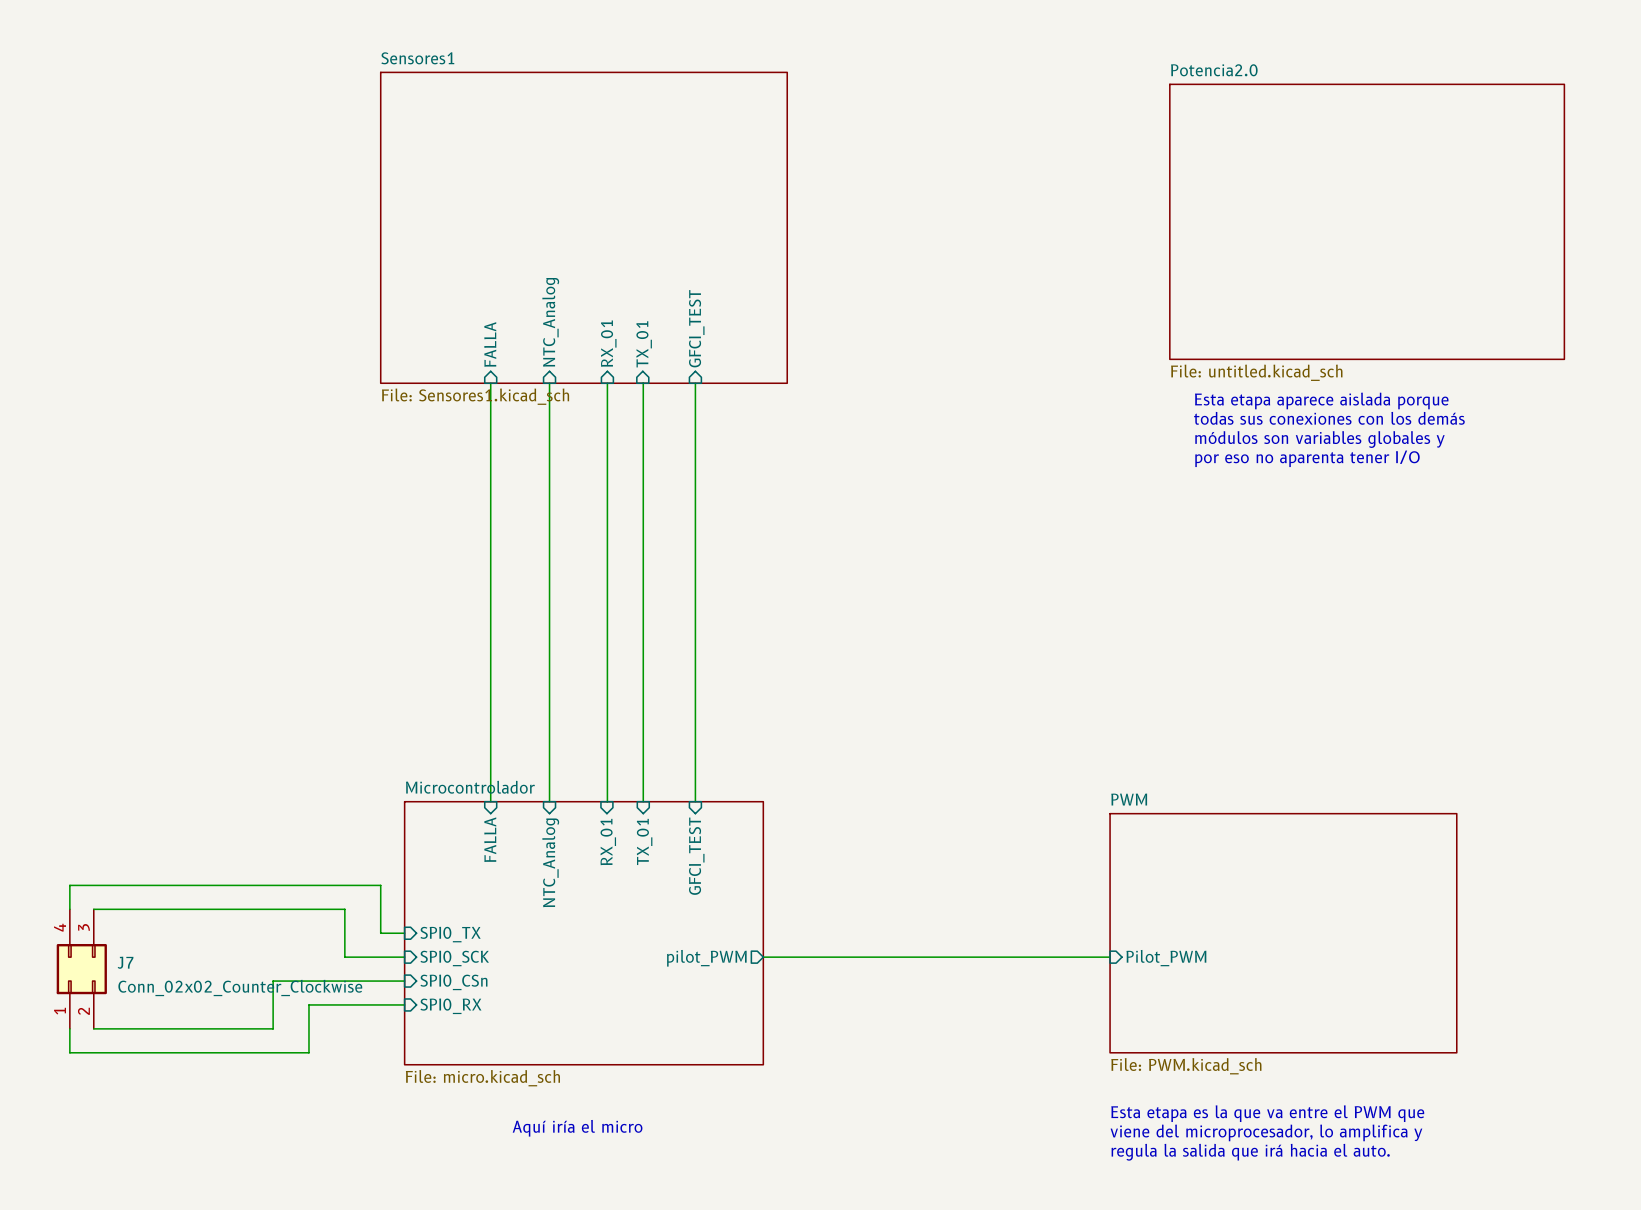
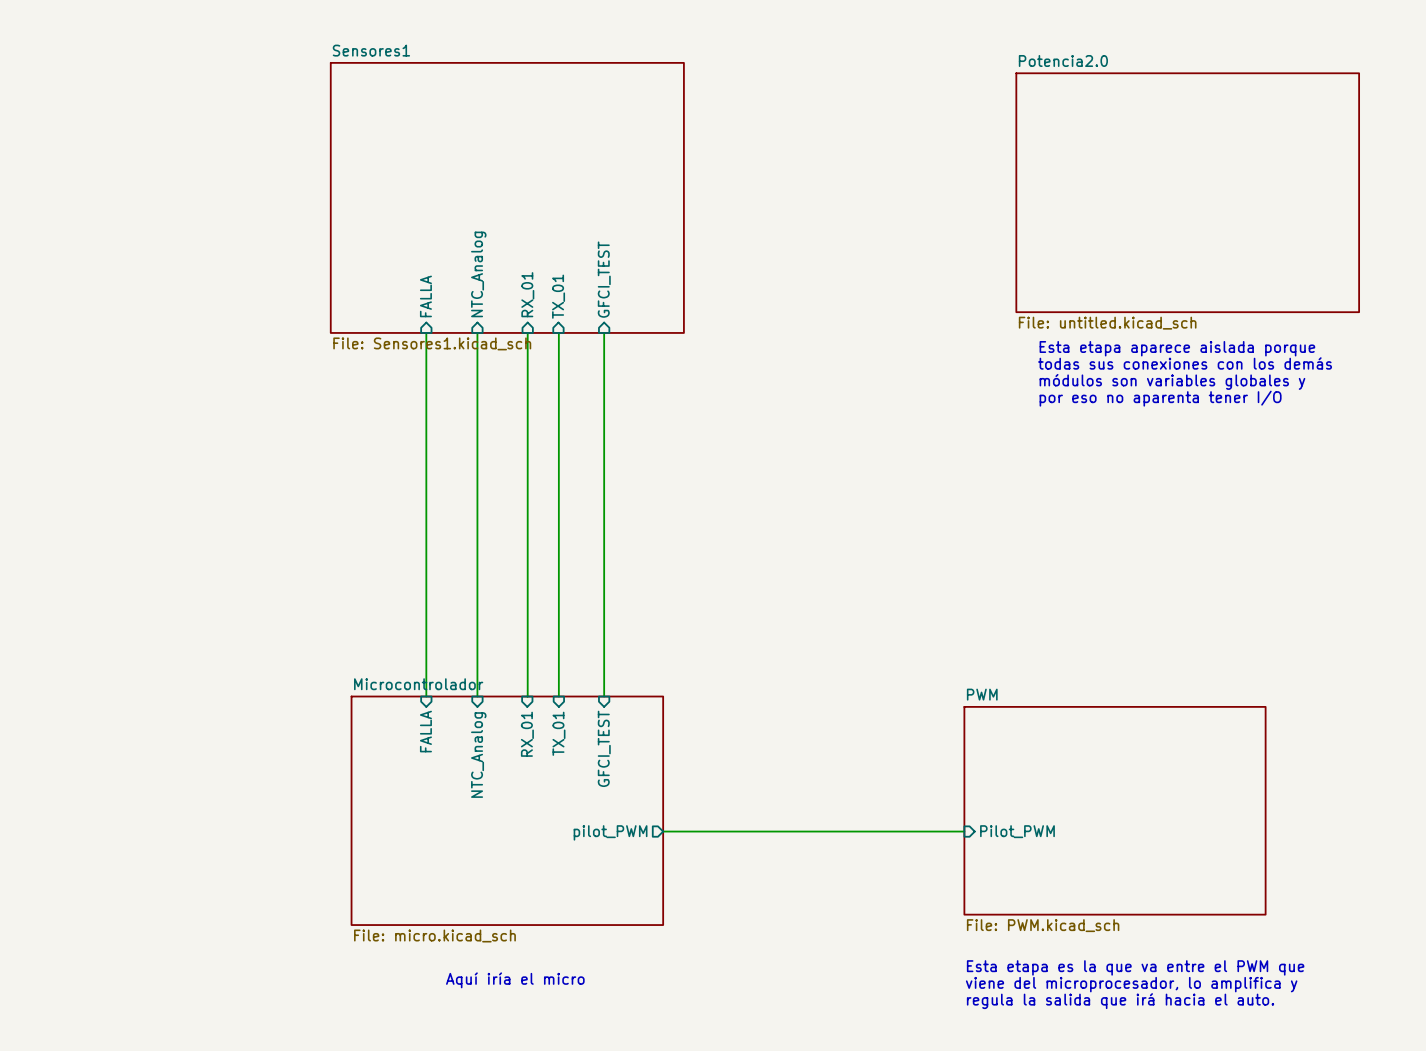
wire: (69, 909) (69, 885) (380, 885) (380, 933) (404, 933) -> none
wire: (93, 909) (344, 909) (344, 957) (404, 957) -> none
sheet pin: SPI0_TX (450, 934) -> none
sheet pin: SPI0_SCK (454, 958) -> none
J7: Conn_02x02_Counter_Clockwise (81, 969) -> none
wire: (404, 981) (273, 981) (273, 1028) (93, 1028) -> none
sheet pin: SPI0_CSn (453, 982) -> none
wire: (404, 1004) (308, 1004) (308, 1052) (69, 1052) (69, 1028) -> none
sheet pin: SPI0_RX (450, 1006) -> none

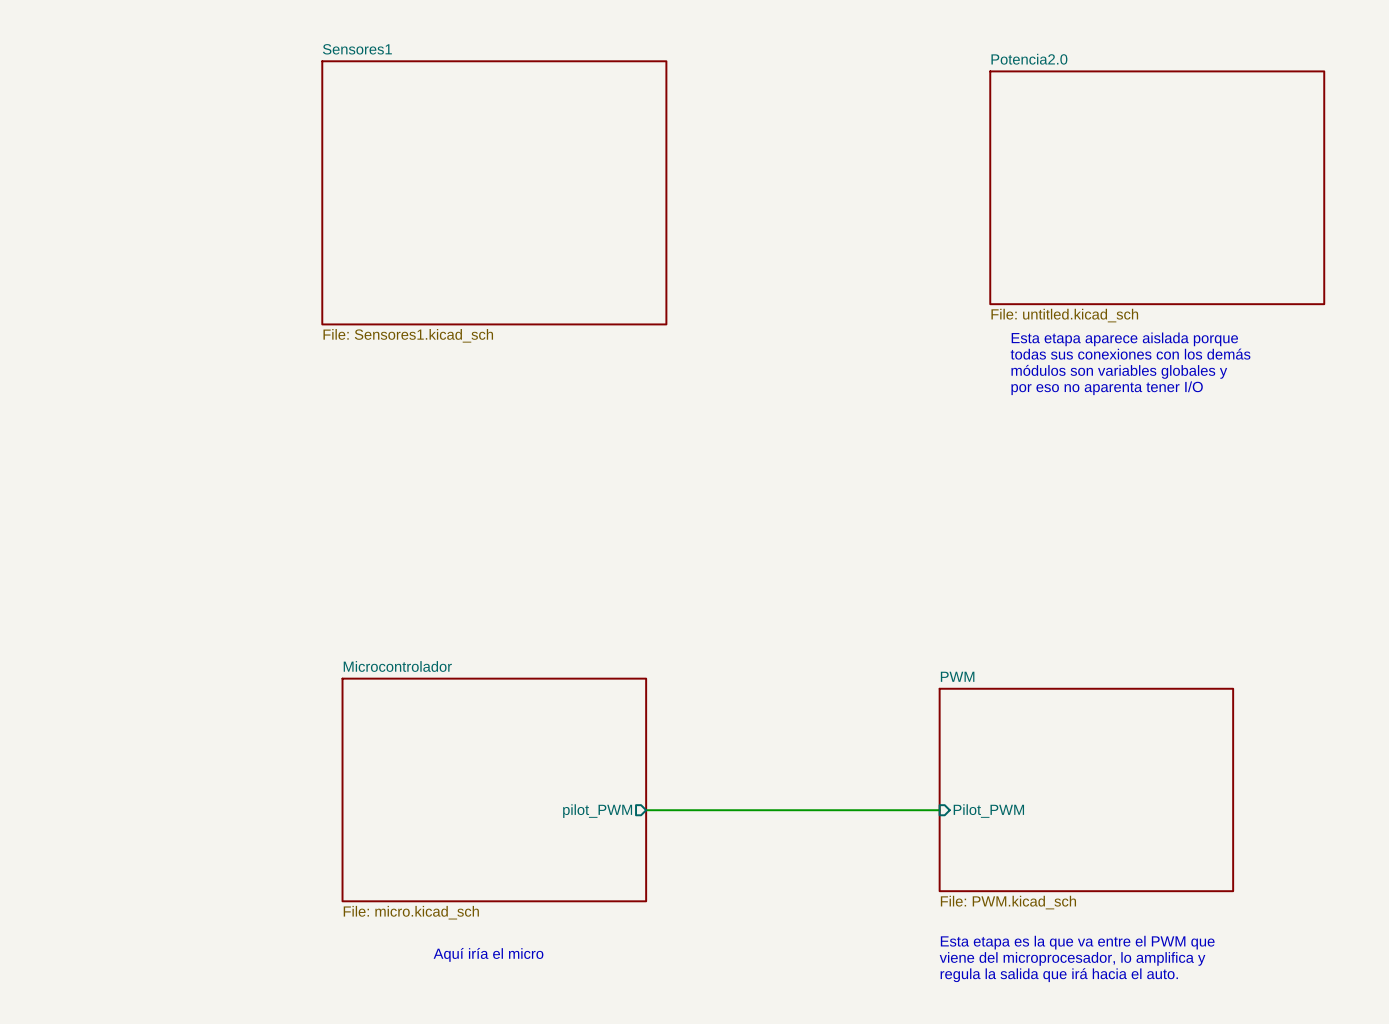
sheet pin: NTC_Analog (478, 274) -> none
sheet pin: GFCI_TEST (604, 279) -> none
sheet pin: RX_01 (527, 294) -> none
sheet pin: FALLA (425, 296) -> none
sheet pin: TX_01 (558, 296) -> none
wire: (426, 332) (426, 696) -> none
wire: (477, 332) (477, 696) -> none
wire: (527, 332) (527, 696) -> none
wire: (558, 332) (558, 696) -> none
wire: (604, 332) (604, 696) -> none
sheet pin: FALLA (425, 731) -> none
sheet pin: TX_01 (558, 733) -> none
sheet pin: RX_01 (527, 734) -> none
sheet pin: GFCI_TEST (604, 748) -> none
sheet pin: NTC_Analog (478, 755) -> none

